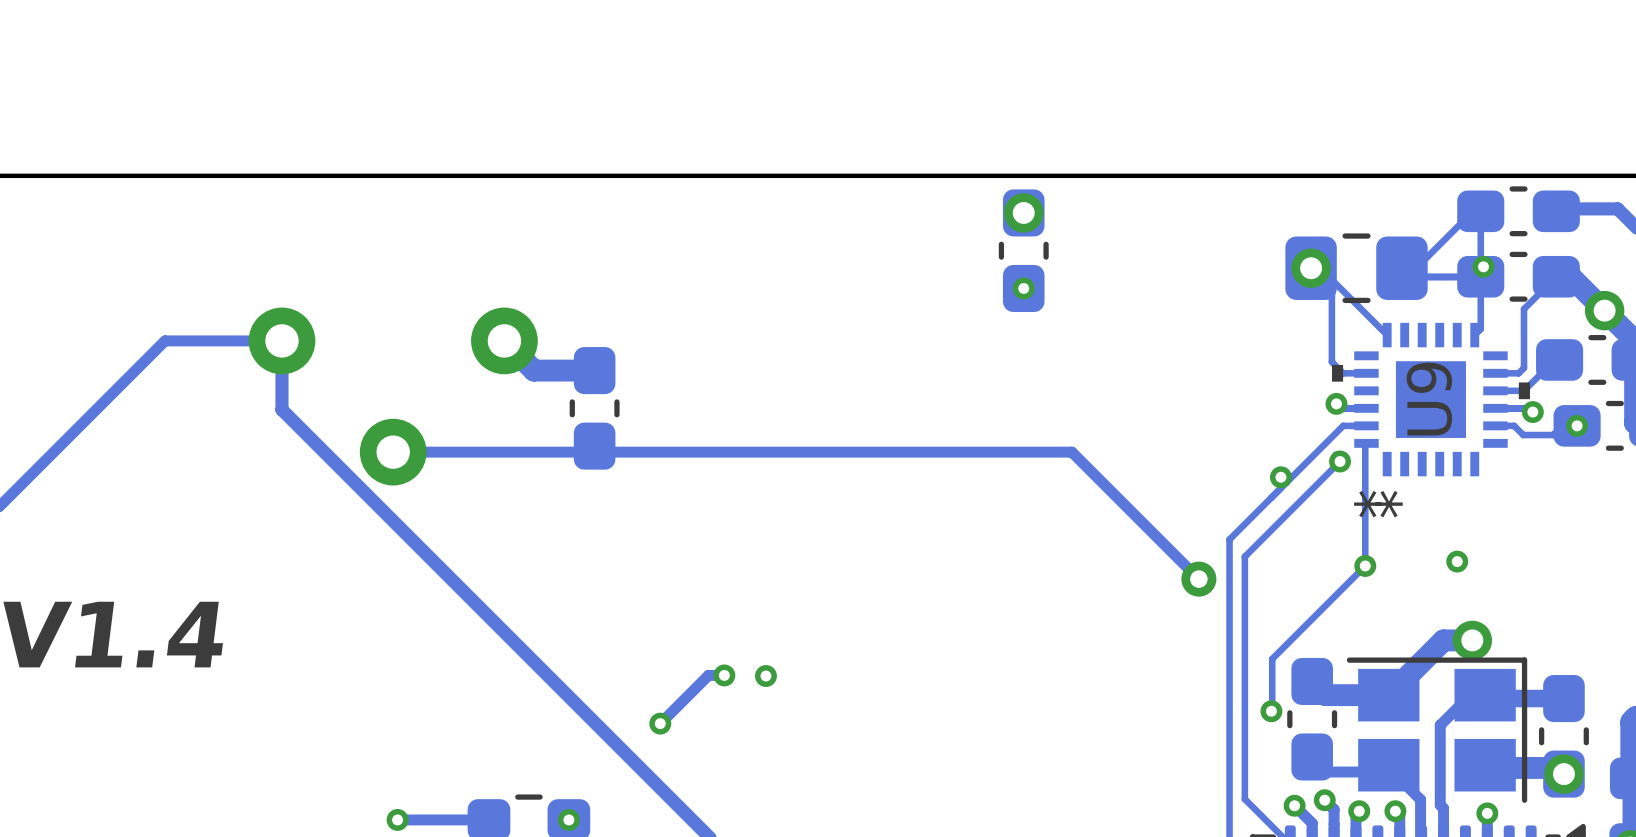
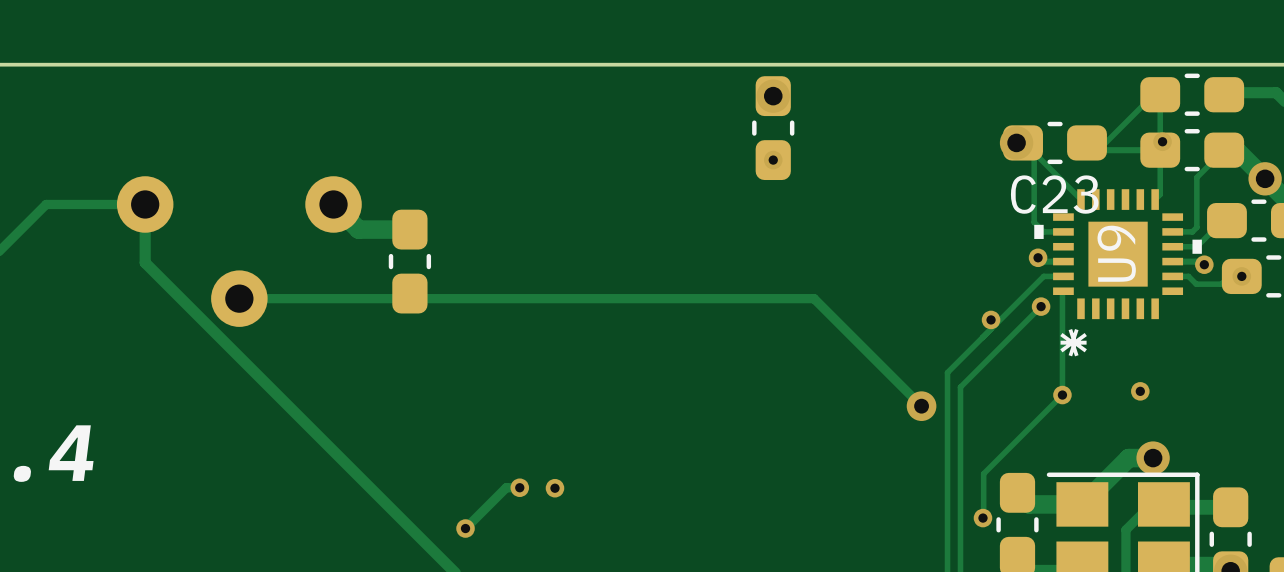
part: (1356, 268) -> none
C23: none -> (1055, 142)

